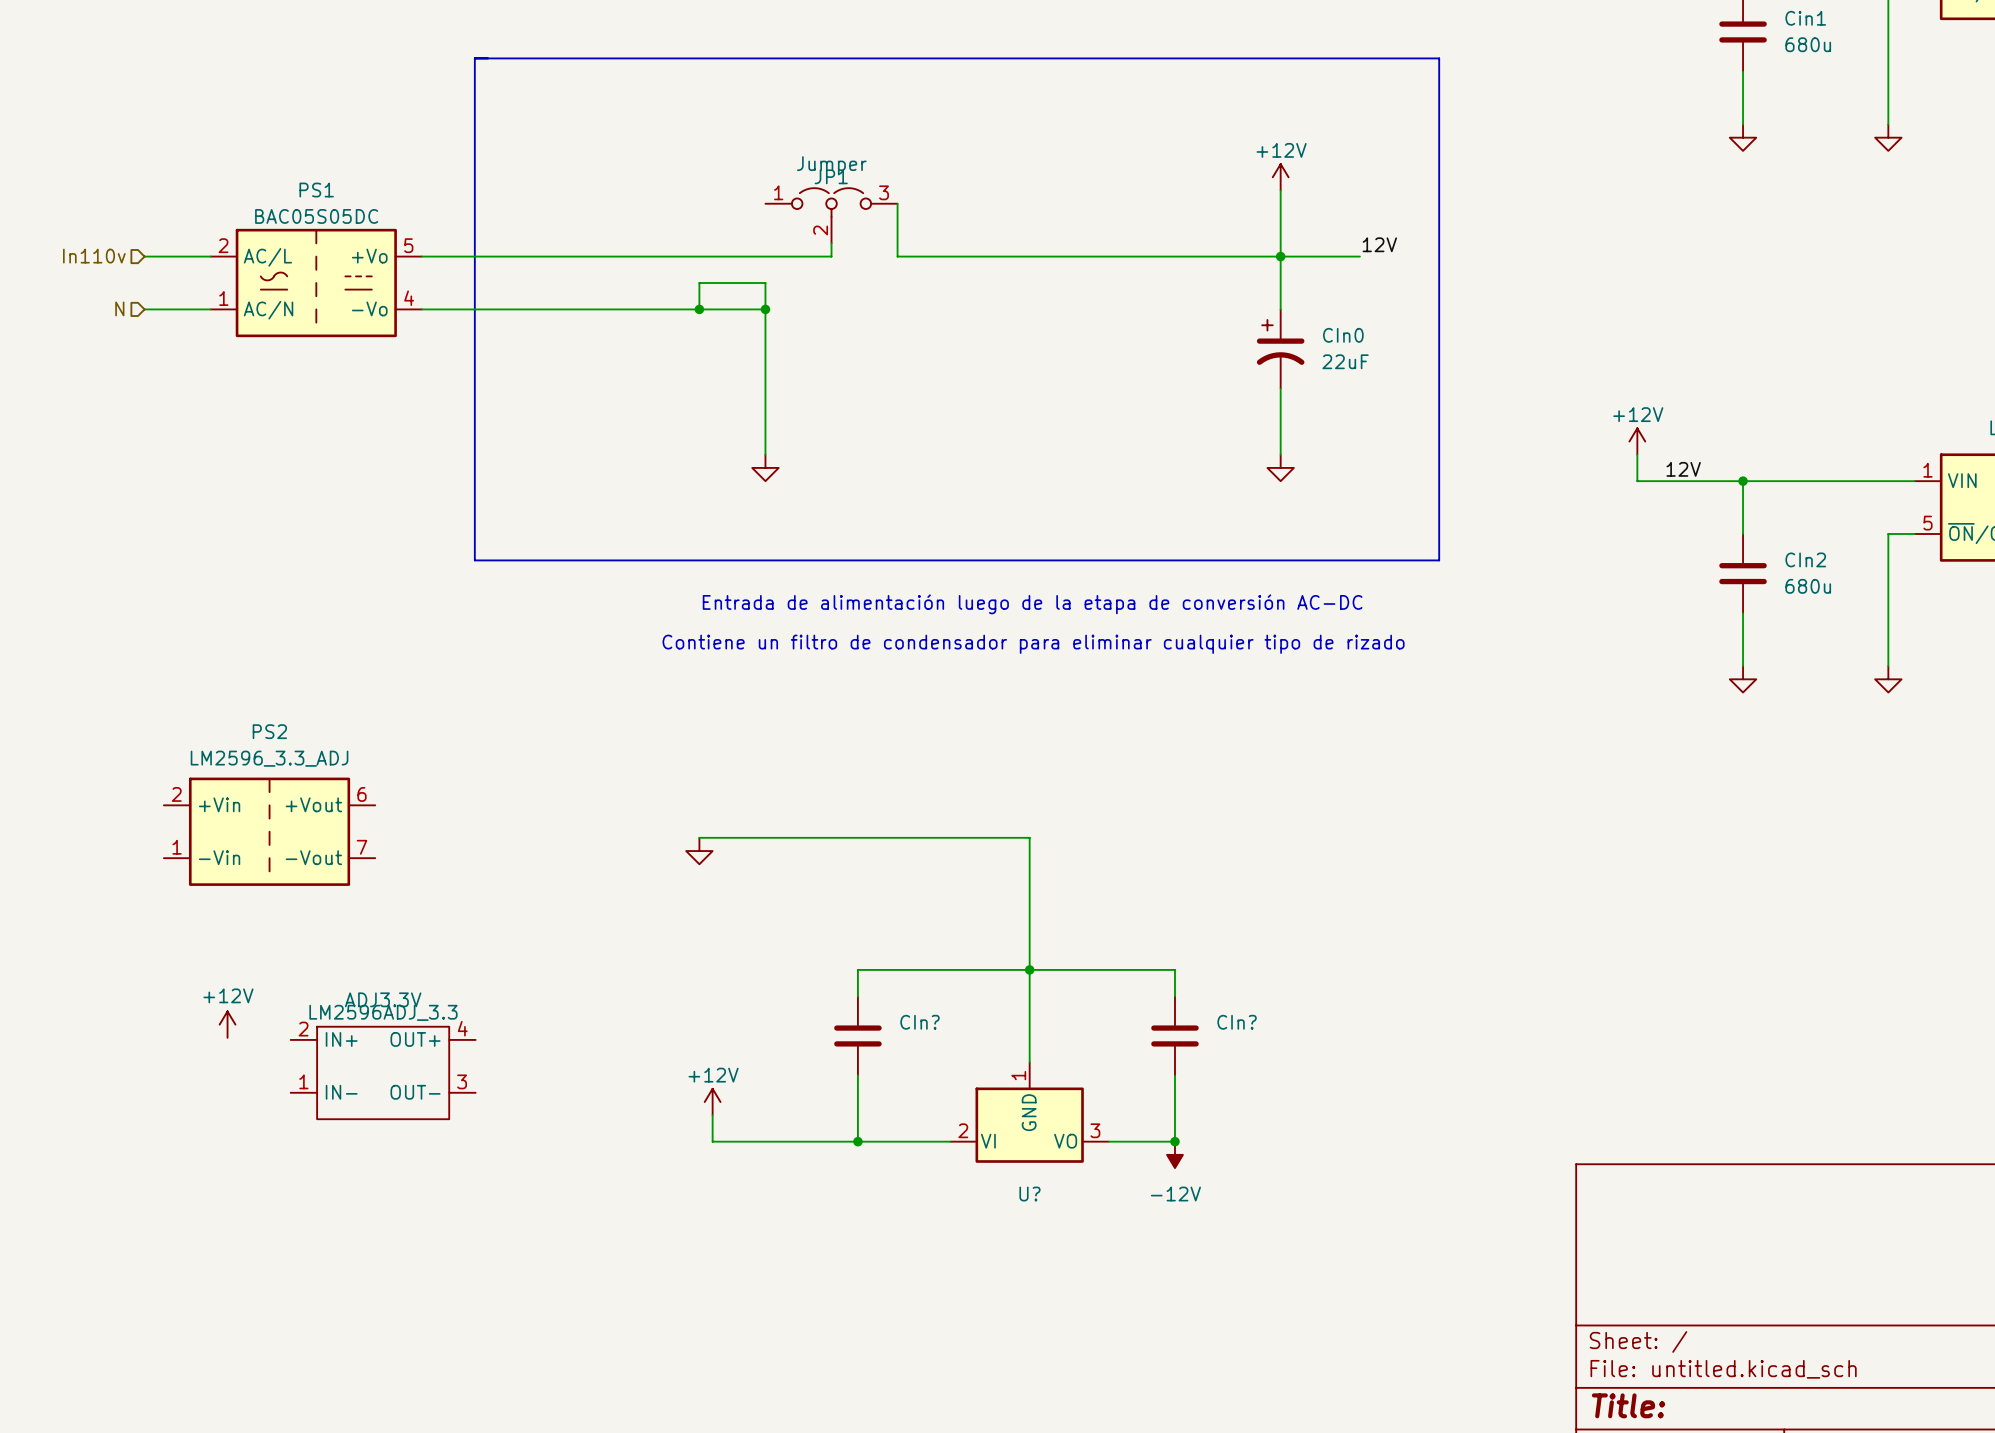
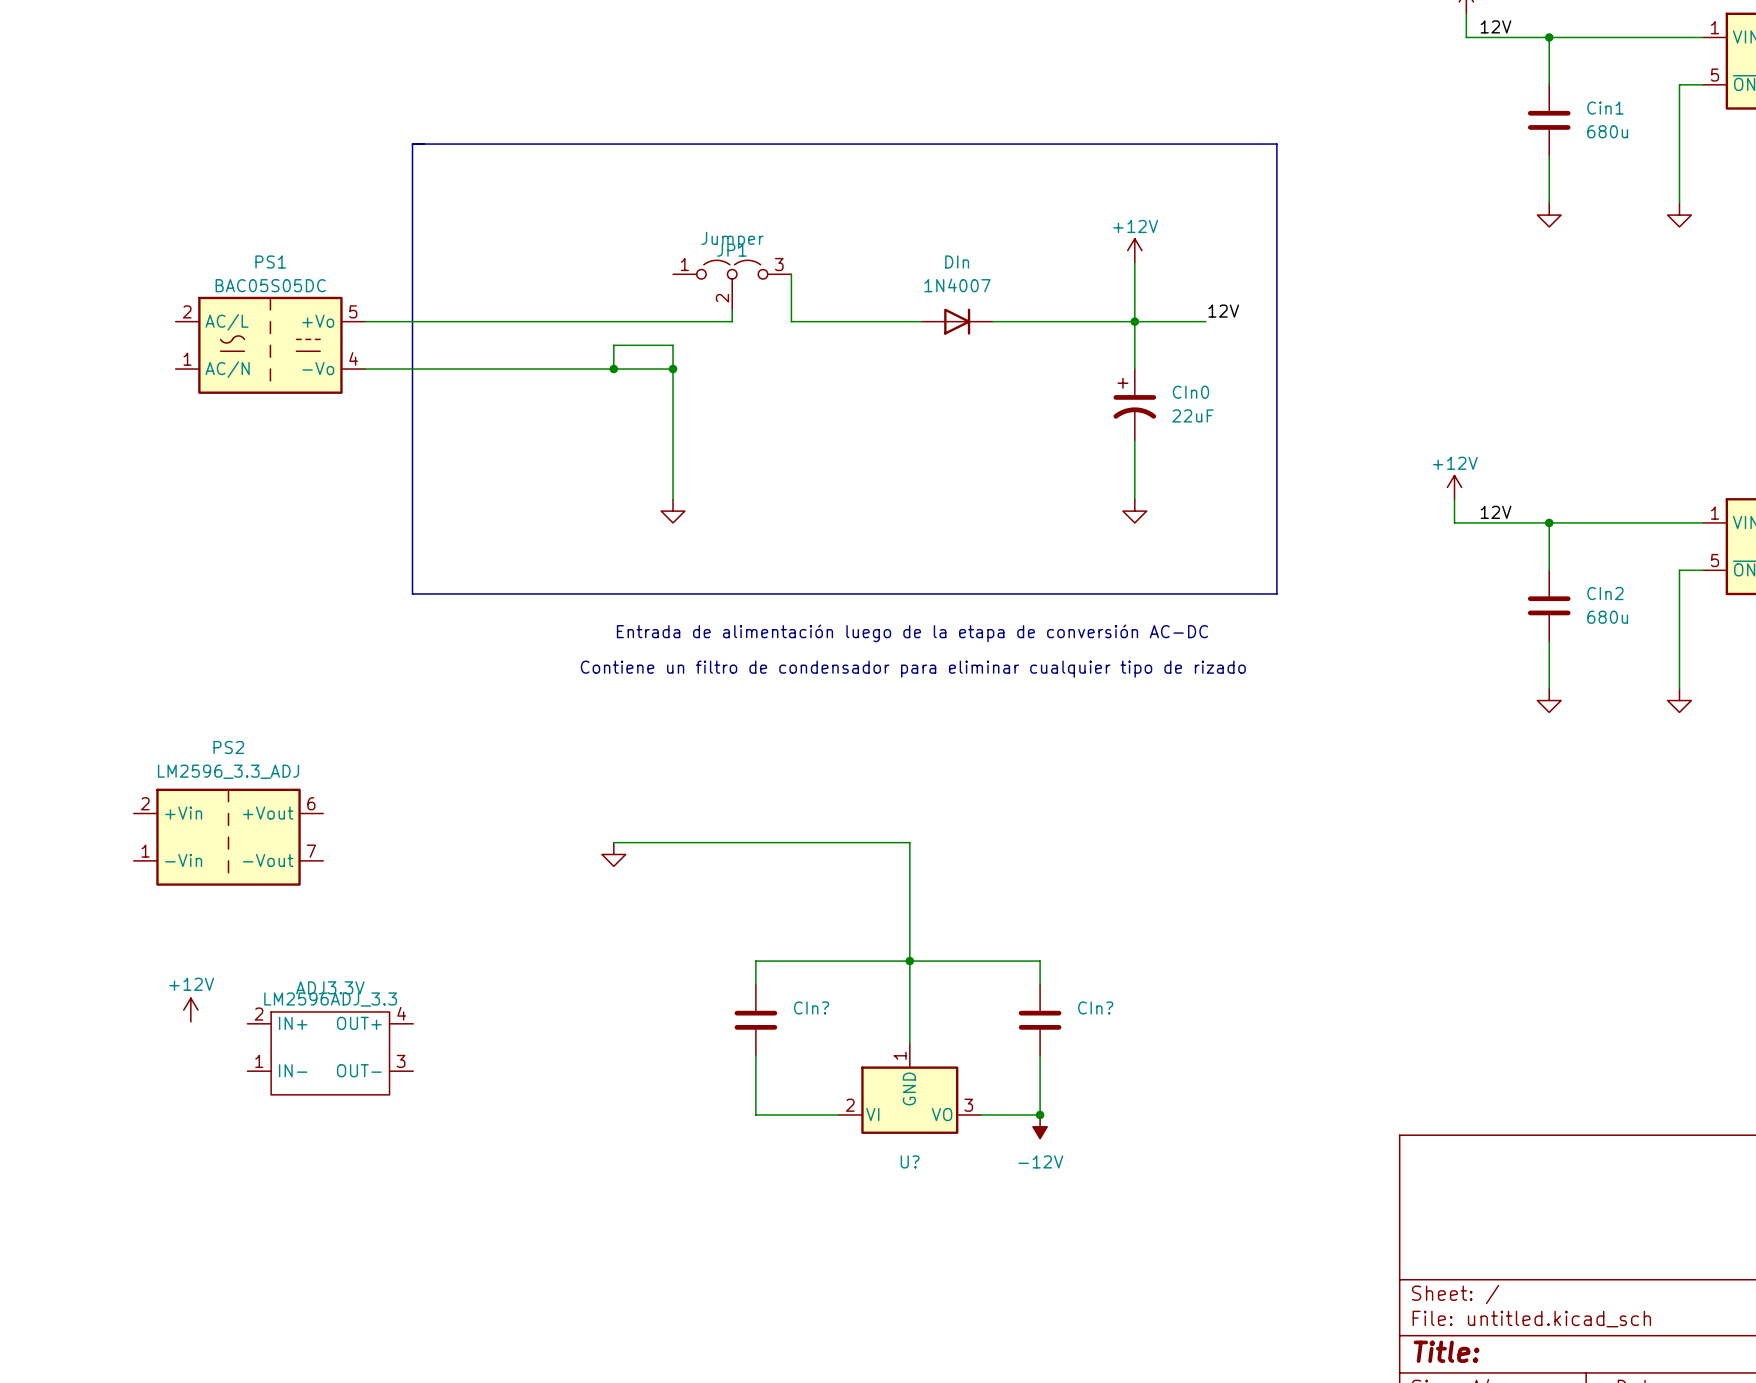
hierarchical label: In110v (94, 256) -> none
wire: (144, 256) (210, 256) -> none
DIn: none -> 1N4007 (957, 321)
hierarchical label: N (119, 308) -> none
wire: (144, 309) (210, 309) -> none
power symbol: +12V (712, 1102) -> none
wire: (712, 1115) (712, 1141) (857, 1141) -> none
junction: (857, 1141) -> none

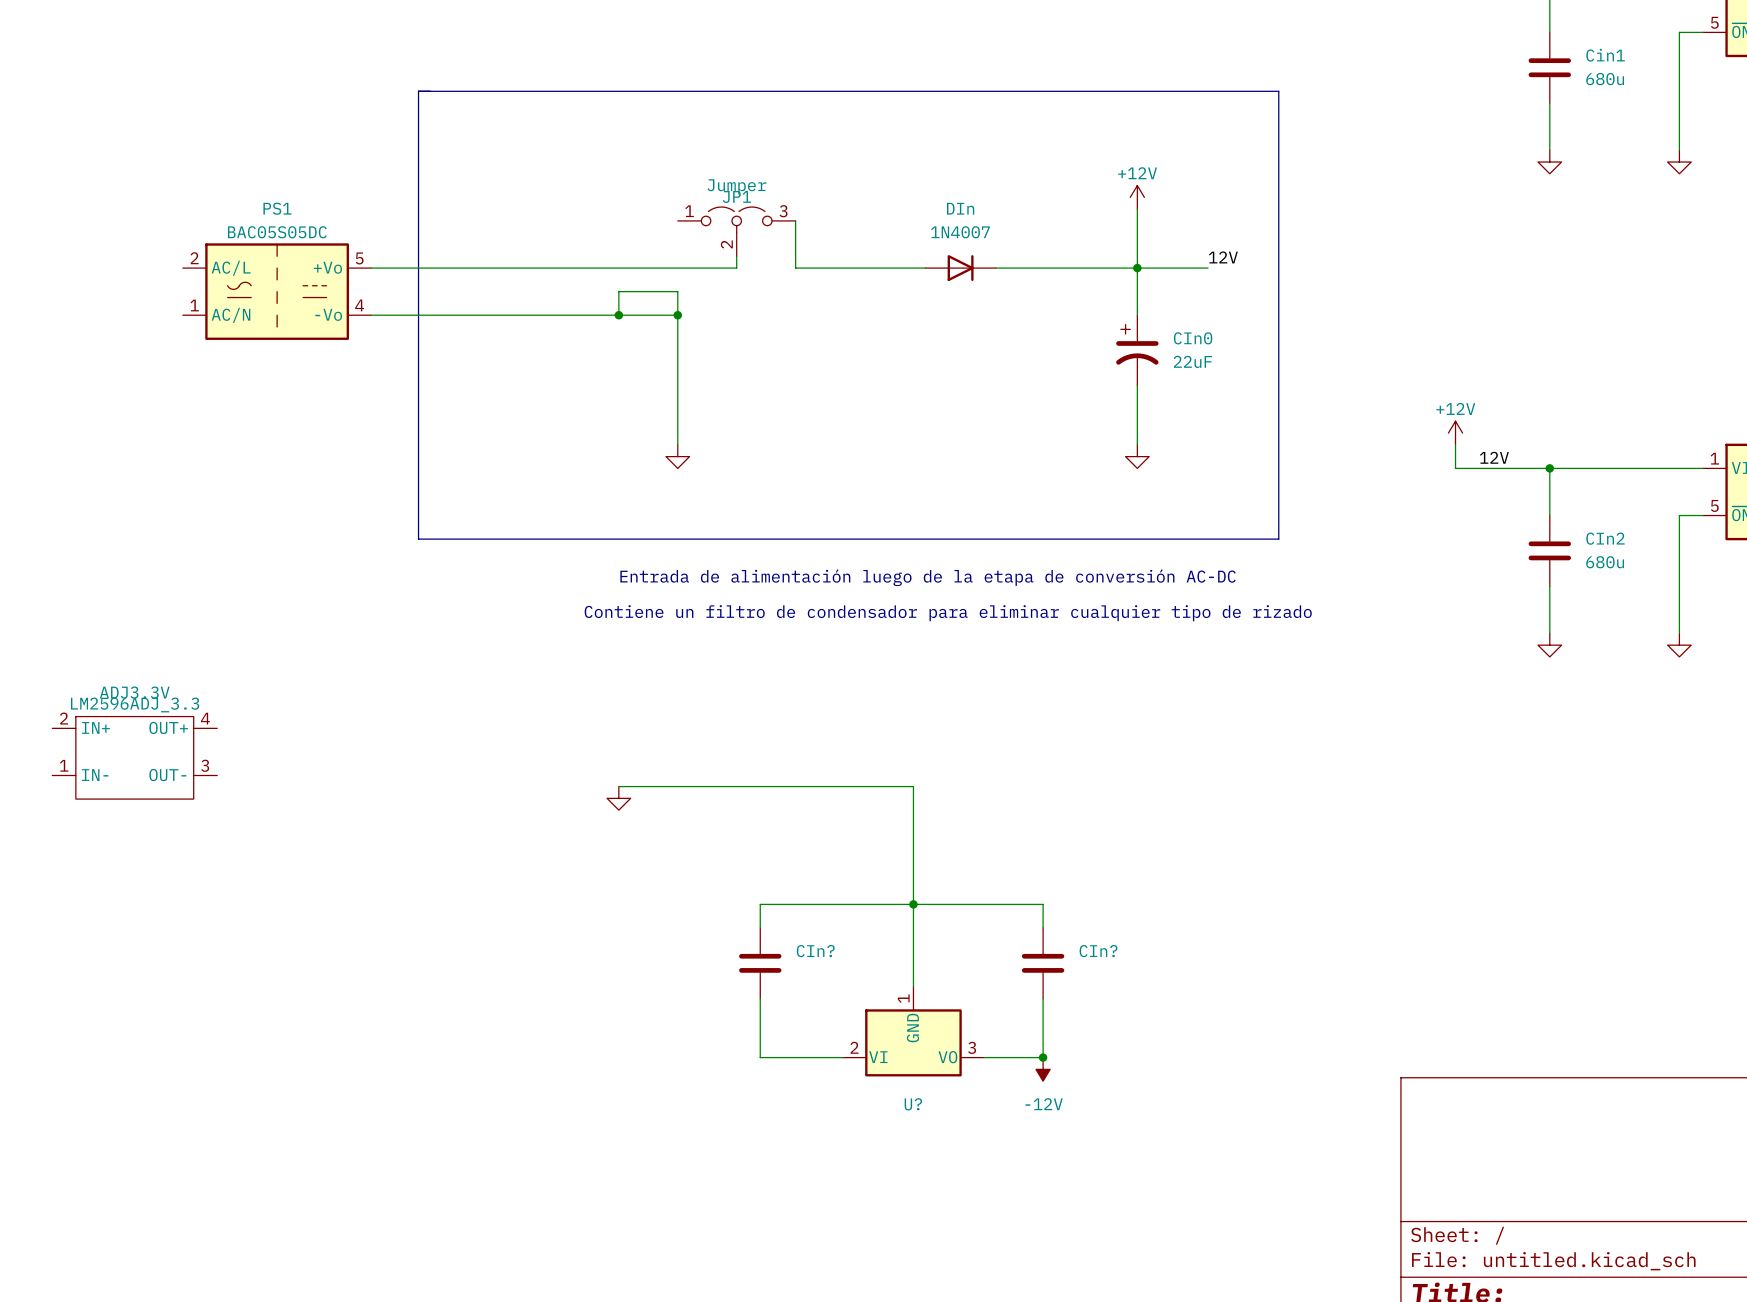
PS2: LM2596_3.3_ADJ (228, 837) -> none
power symbol: +12V (190, 1010) -> none
LM2596ADJ_3.3 position: (330, 1053) -> (134, 757)

